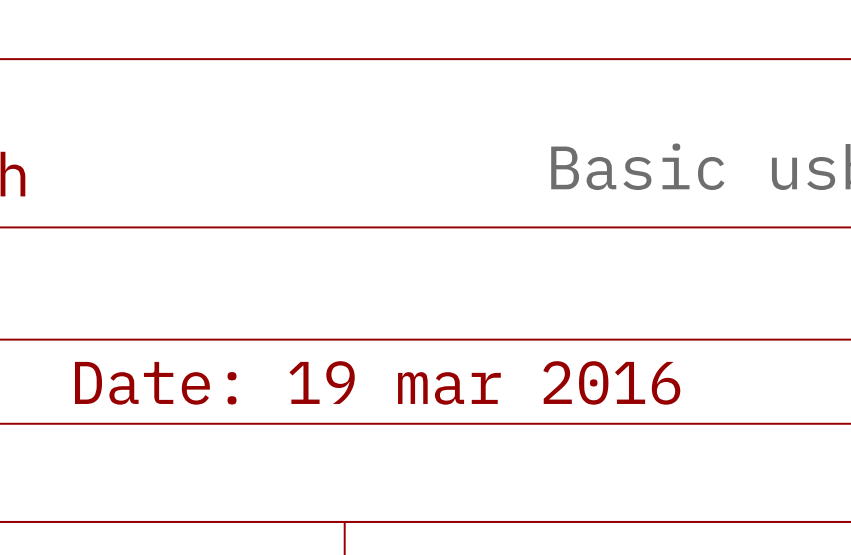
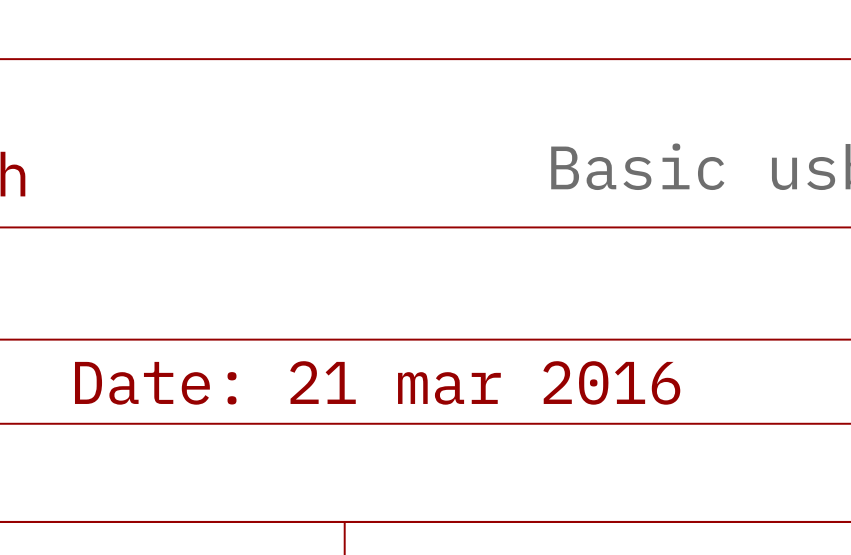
title block: Date: 19 mar 2016 (377, 382) -> Date: 21 mar 2016 (377, 382)

